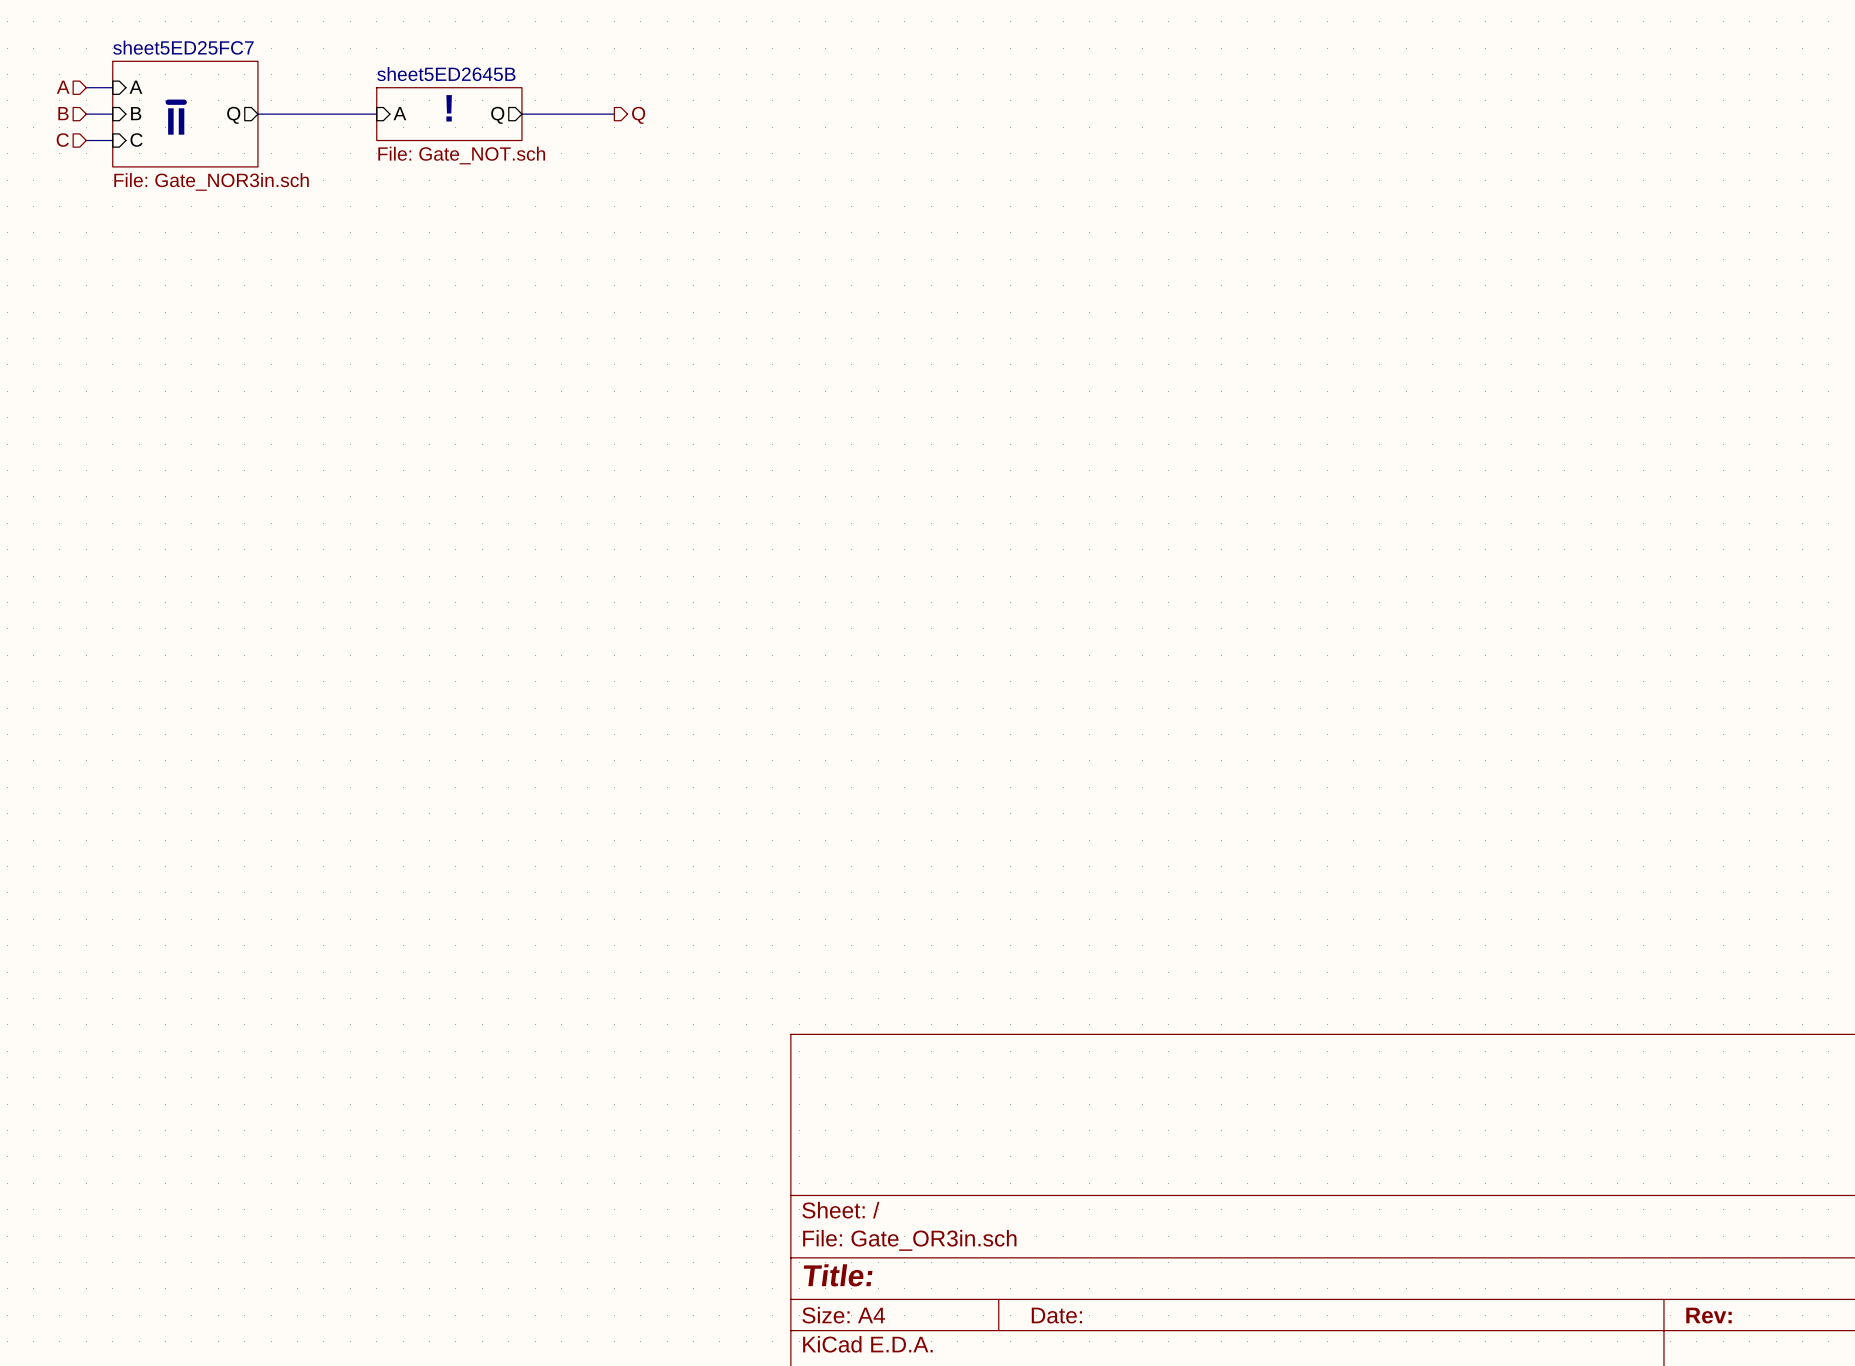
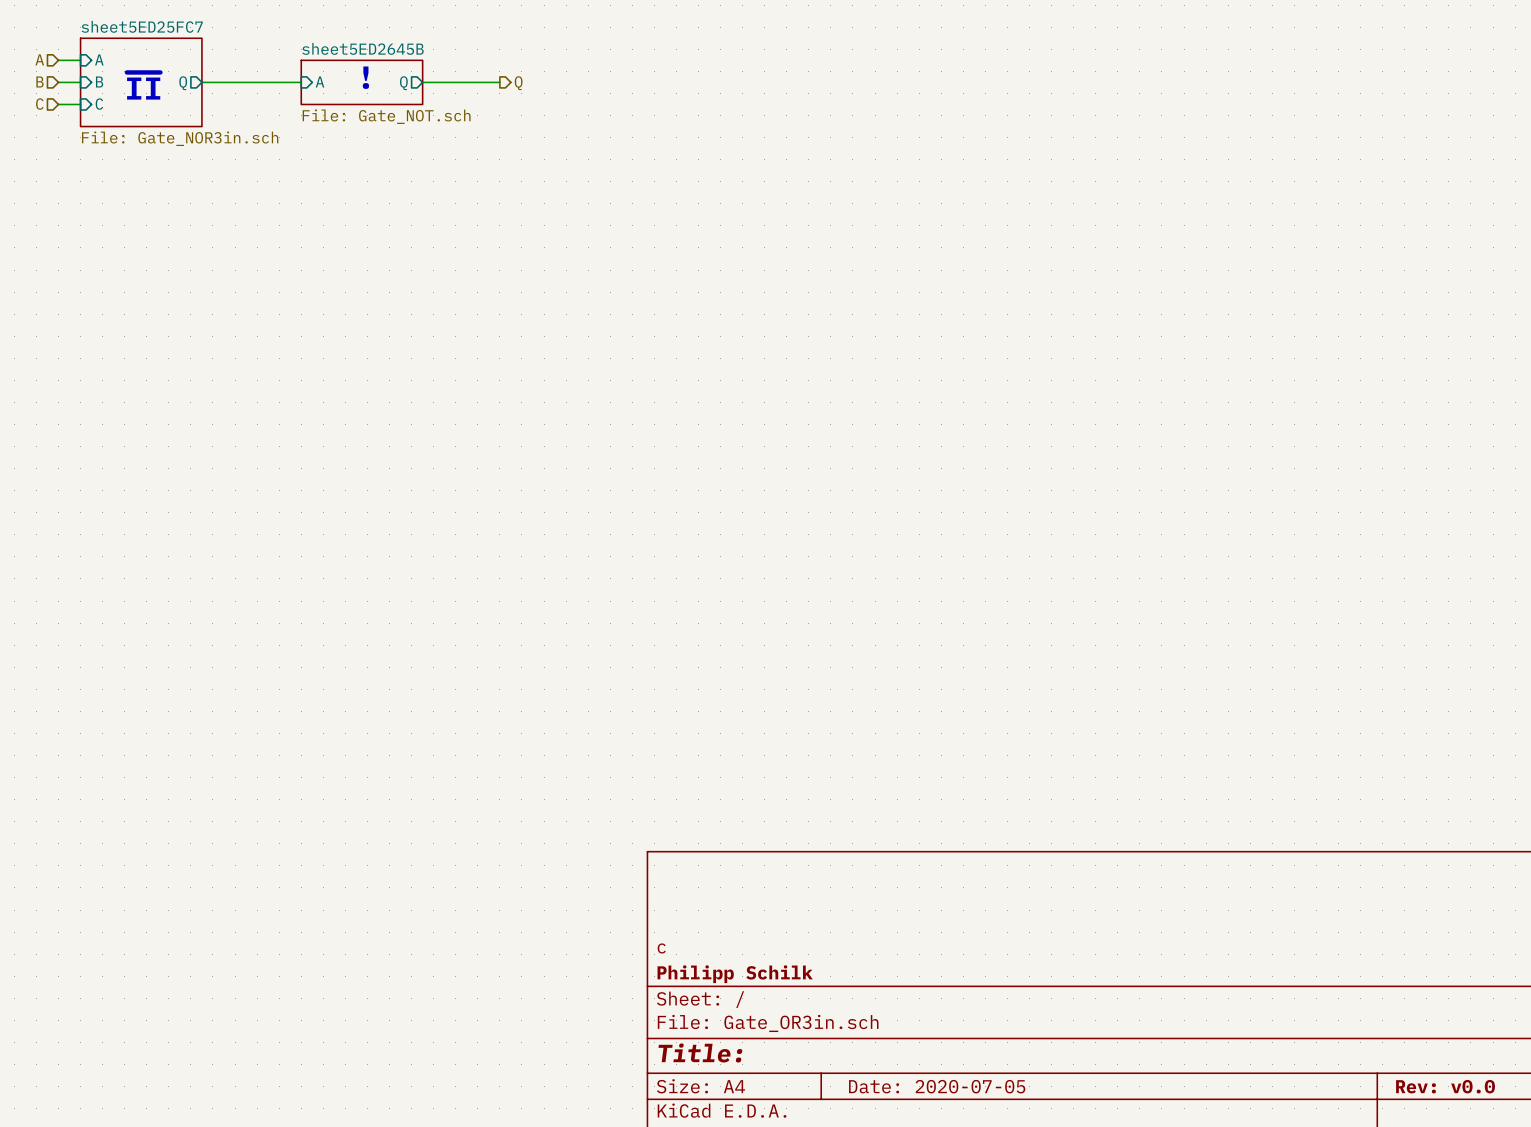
title block: none -> c (661, 948)
title block: none -> Philipp Schilk (735, 974)
title block: Date: (1056, 1315) -> Date: 2020-07-05 (937, 1086)
title block: Rev: (1708, 1315) -> Rev: v0.0 (1445, 1086)

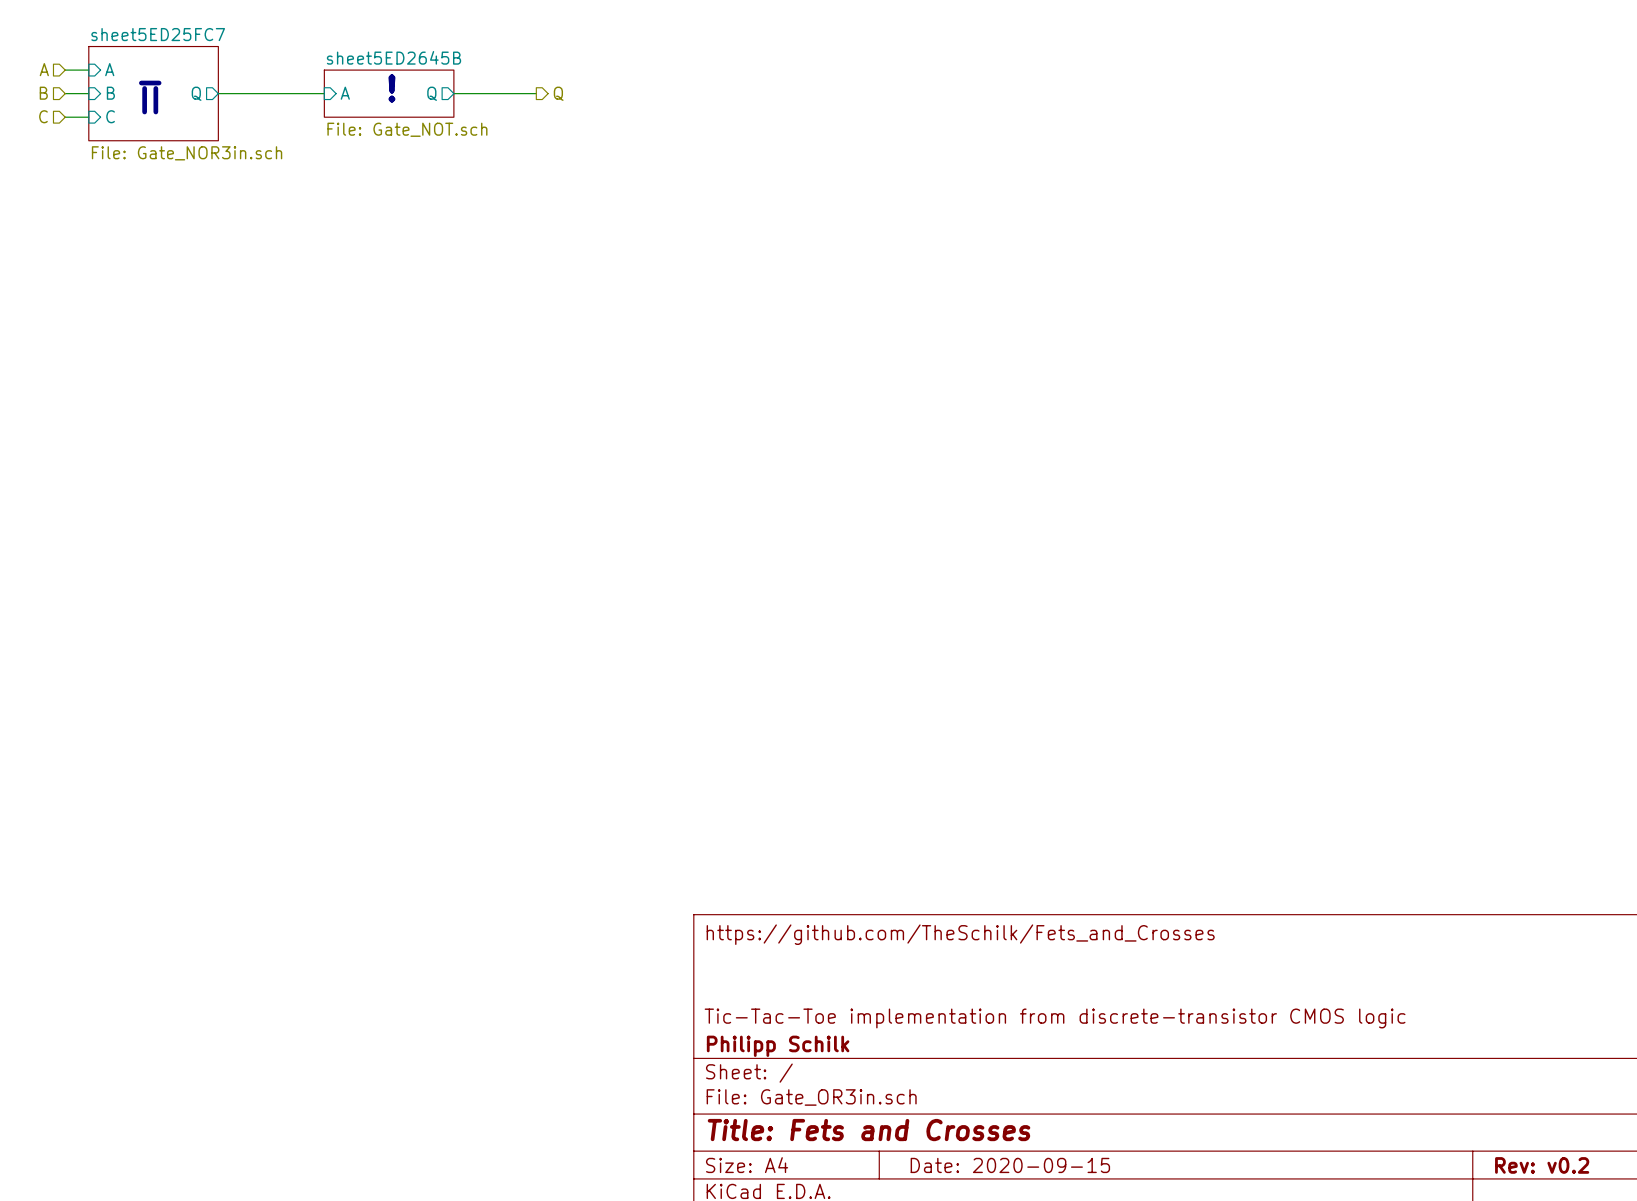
title block: none -> https://github.com/TheSchilk/Fets_and_Crosses (960, 934)
title block: c (661, 948) -> Tic-Tac-Toe implementation from discrete-transistor CMOS logic (1055, 1018)
title block: Title: (700, 1052) -> Title: Fets and Crosses (869, 1130)
title block: Date: 2020-07-05 (937, 1086) -> Date: 2020-09-15 (1010, 1165)
title block: Rev: v0.0 (1445, 1086) -> Rev: v0.2 (1542, 1165)

